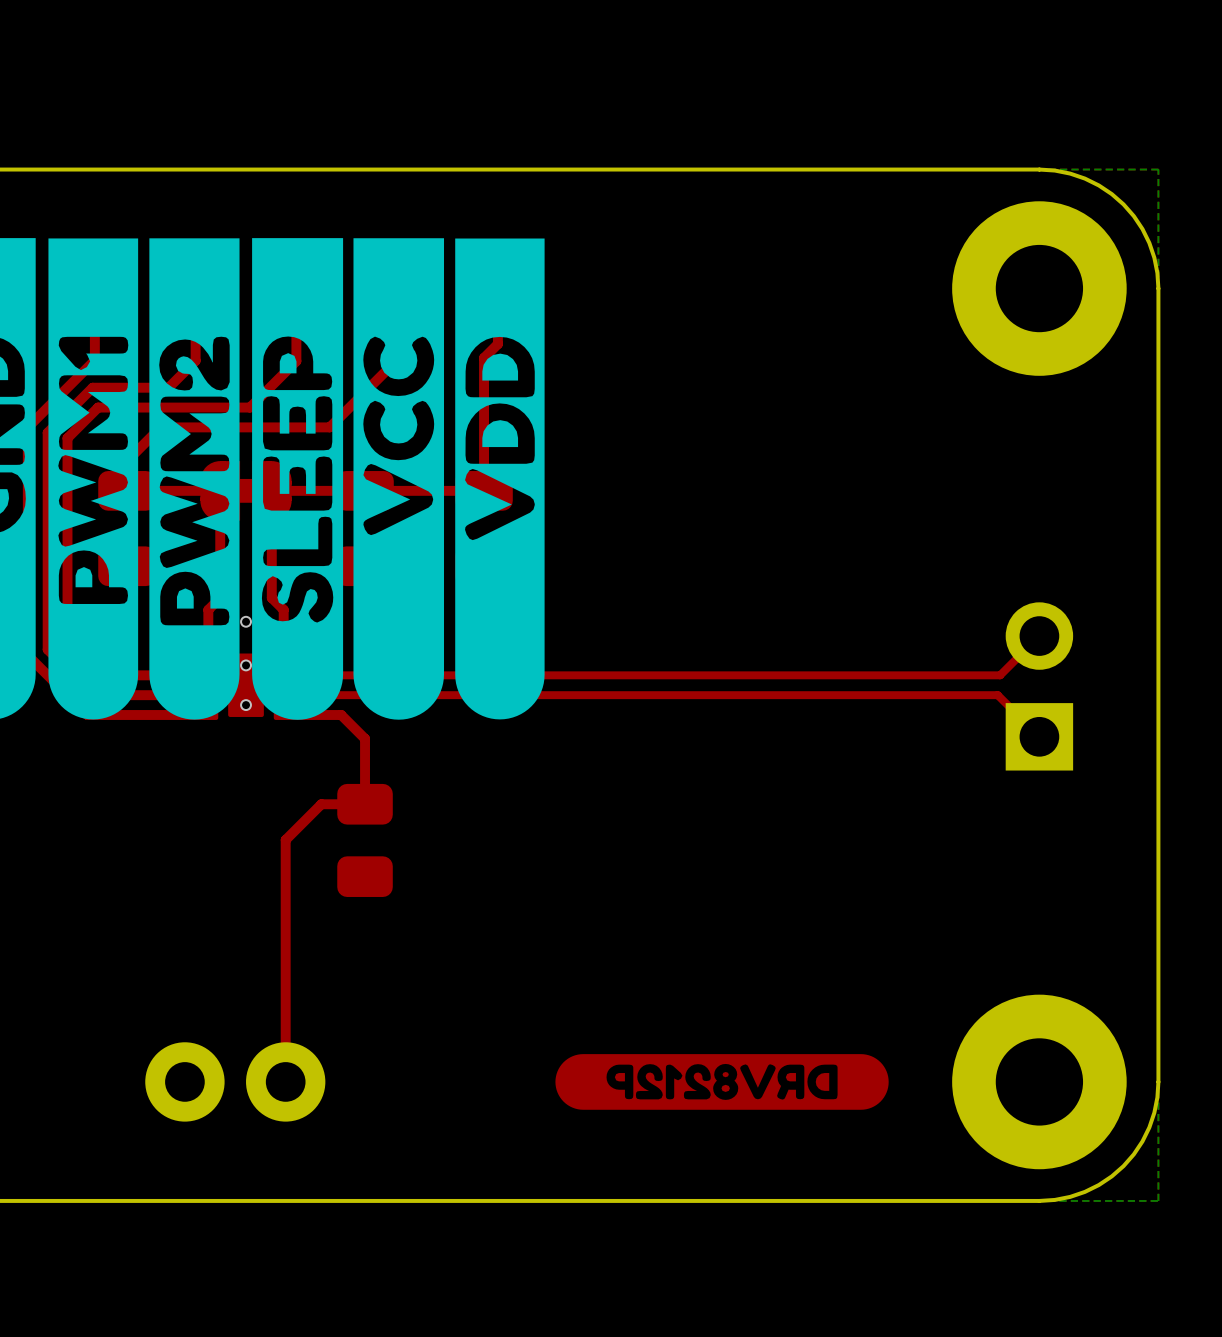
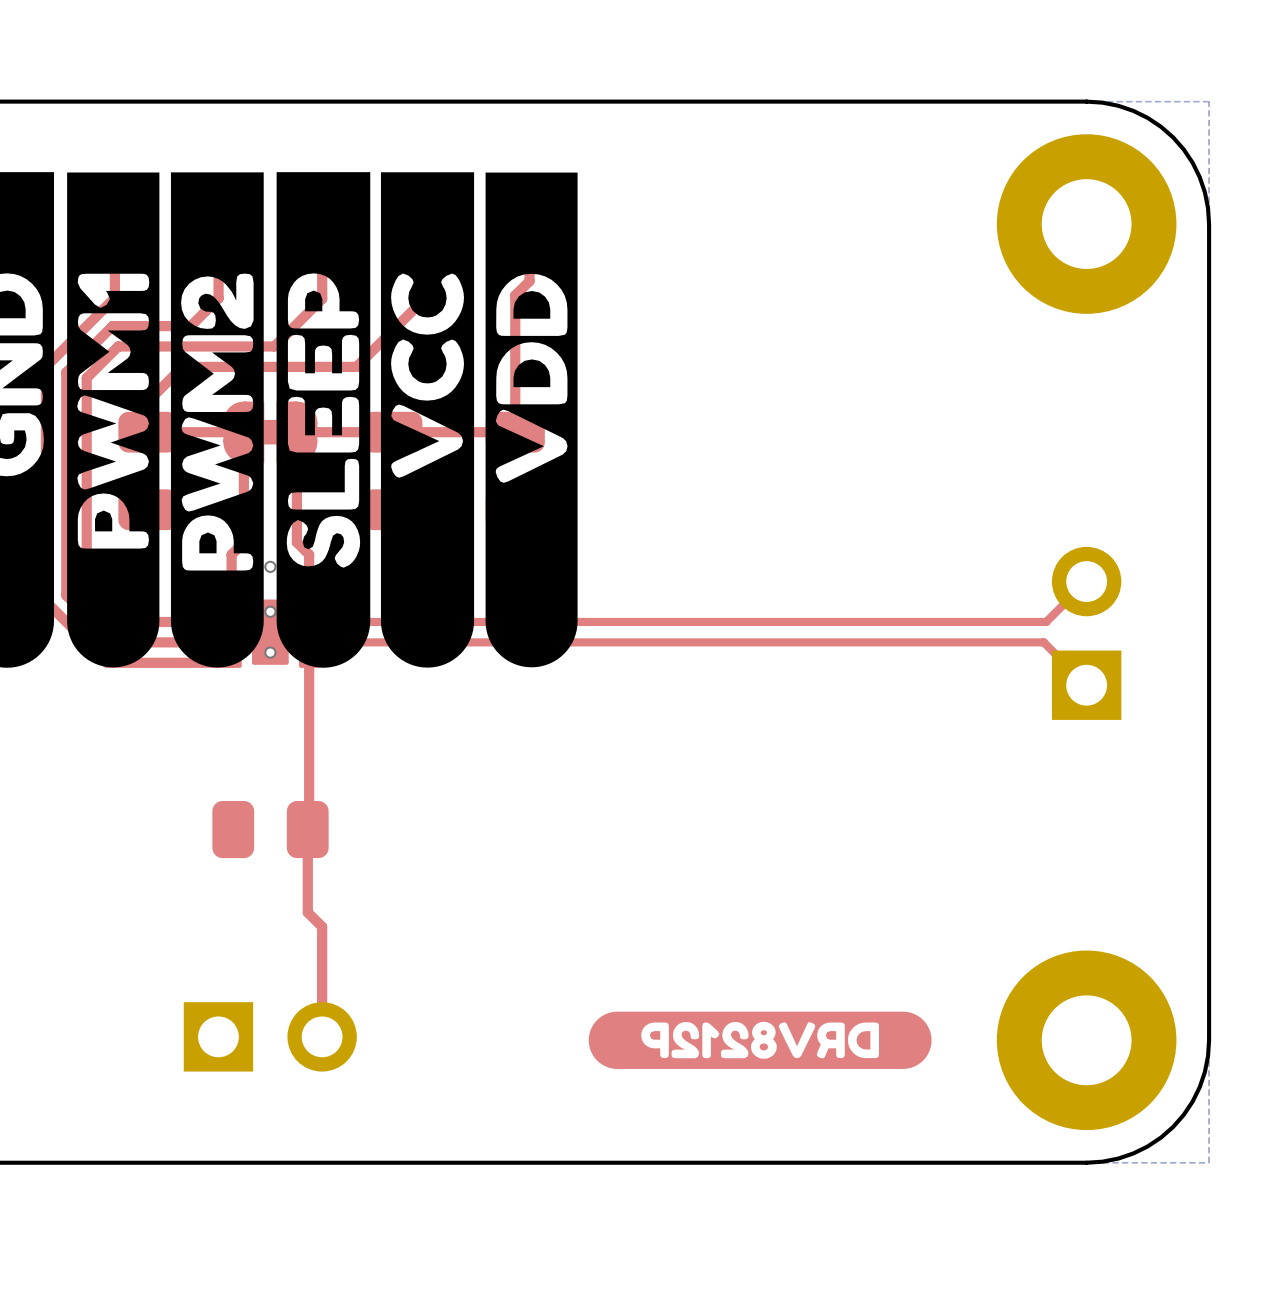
top track: (283, 715) (341, 715) (365, 738) (365, 804) (321, 804) (285, 839) (285, 1081) -> (309, 662) (307, 912) (322, 926) (322, 1036)
part rotation: 0° (365, 840) -> 90° clockwise (270, 829)
part position: (365, 840) -> (270, 829)
part footprint: [145, 1042, 326, 1122] -> [183, 1002, 357, 1072]

